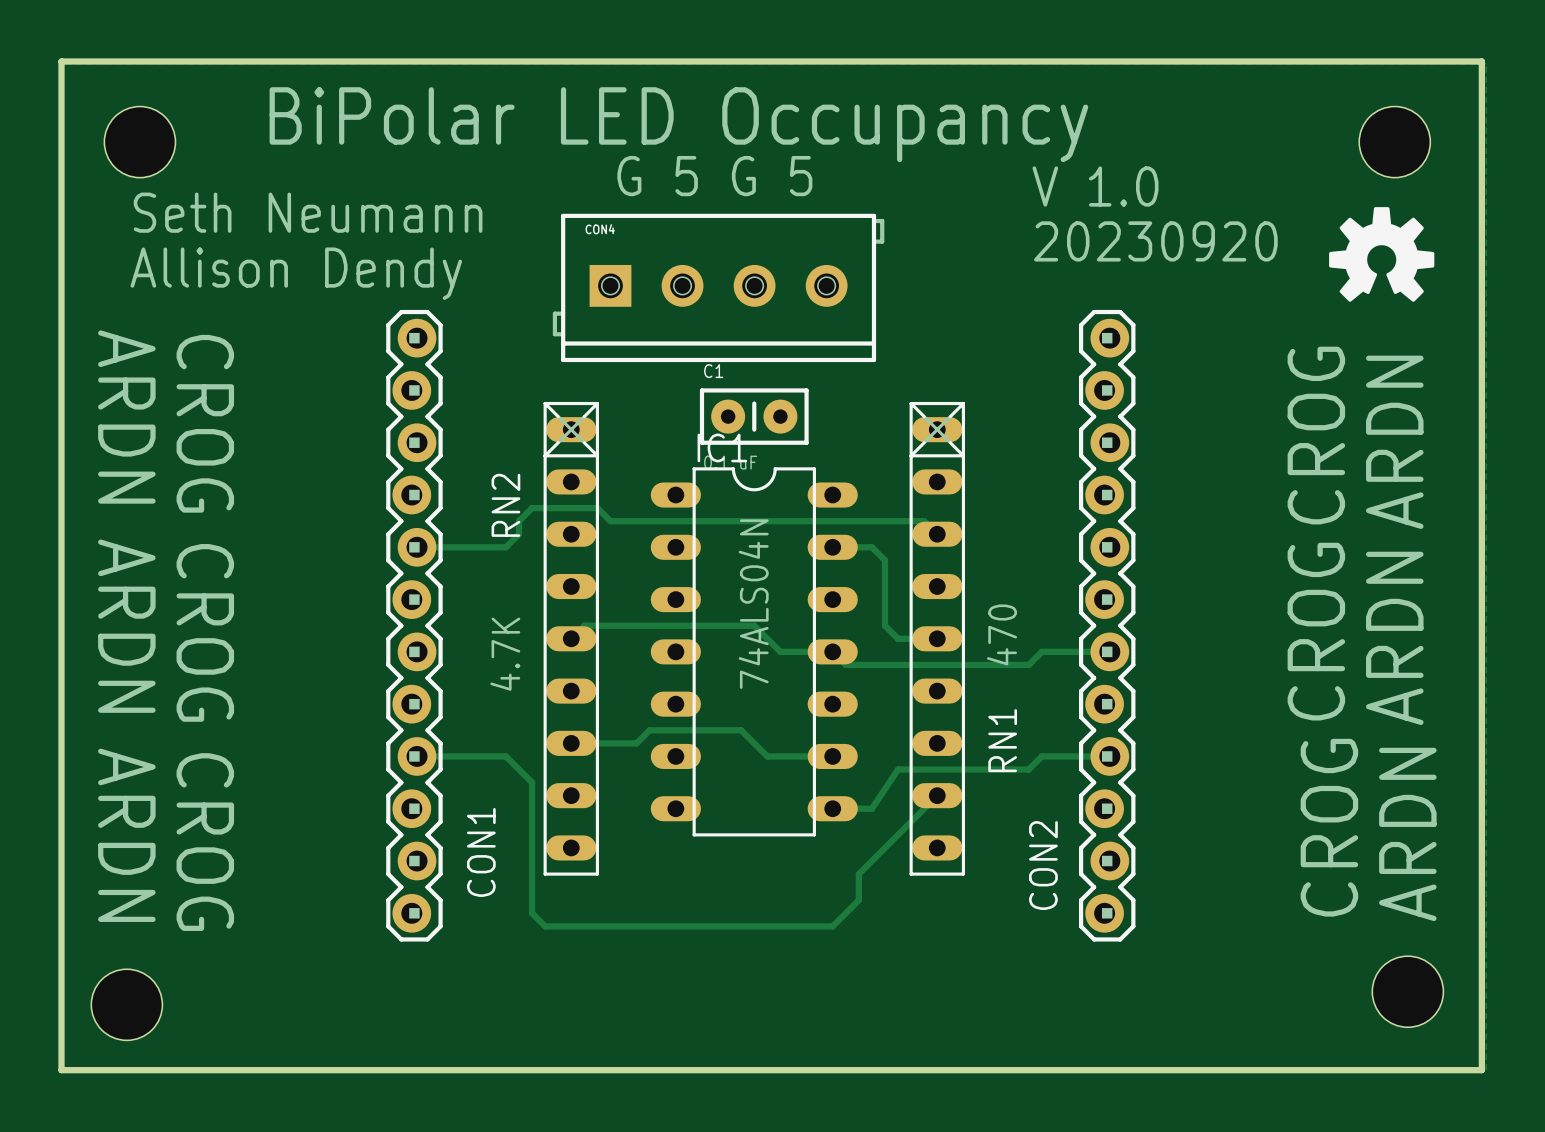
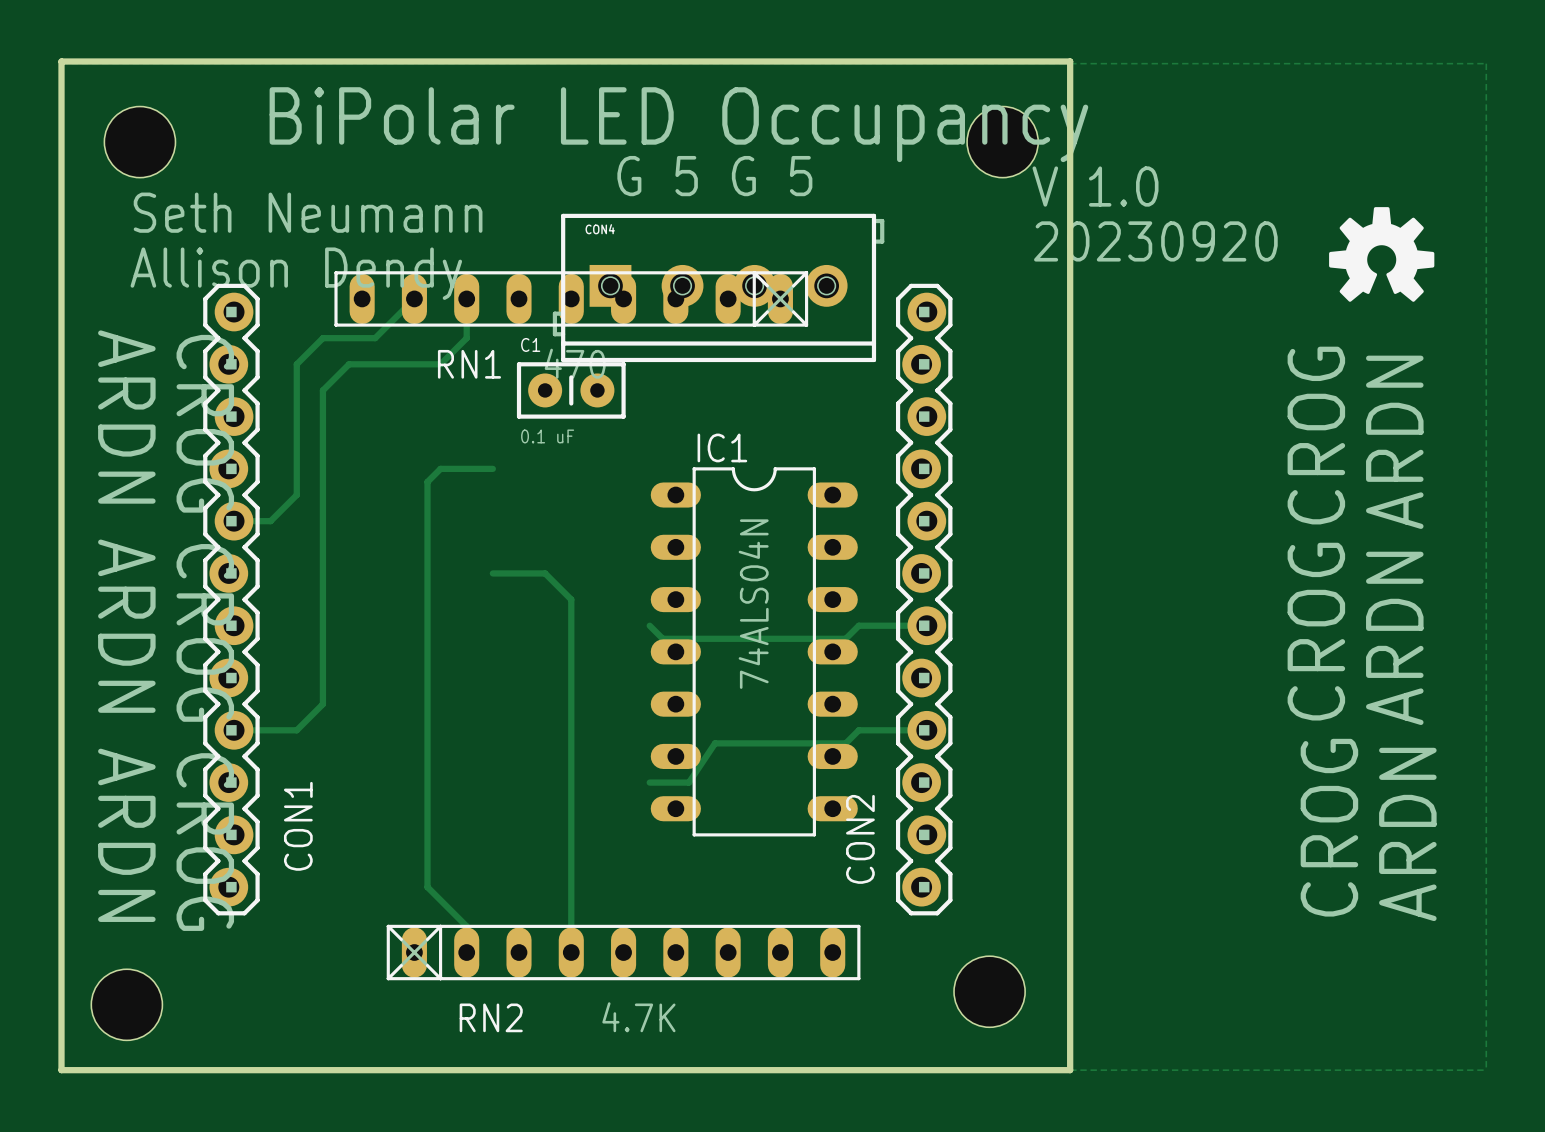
board edge: (1070, 61) (1481, 61) (1481, 1070) (1070, 1070) -> (1070, 61) (1070, 1070)
hole position: (1394, 142) -> (1002, 142)
track: none -> (414, 298) (375, 338) (322, 338) (296, 364) (296, 495) (270, 521) (234, 521)
track: none -> (466, 298) (466, 338) (440, 364) (349, 364) (322, 390) (322, 704) (296, 730) (234, 730)
C1 position: (754, 416) -> (571, 390)
track: none -> (492, 468) (440, 468) (427, 481) (427, 887) (466, 926) (466, 952)
track: (937, 534) (924, 521) (610, 521) (597, 508) (532, 508) (519, 521) (519, 534) (505, 547) (417, 547) -> none
track: (832, 547) (871, 547) (885, 560) (885, 625) (898, 638) (937, 638) -> none
track: none -> (492, 573) (545, 573) (571, 599) (571, 952)
CON1 position: (414, 625) -> (231, 599)
track: none -> (649, 625) (662, 638) (845, 638) (858, 625) (926, 625)
CON2 position: (1107, 625) -> (924, 599)
track: (571, 638) (584, 625) (754, 625) (780, 651) (832, 651) (845, 664) (1028, 664) (1041, 651) (1109, 651) -> none
RN2 rotation: 0° (571, 638) -> 90° counterclockwise (623, 952)
RN2 position: (571, 638) -> (623, 952)
RN1 rotation: 0° (937, 638) -> 90° clockwise (571, 298)
RN1 position: (937, 638) -> (571, 298)
track: (571, 743) (636, 743) (649, 730) (741, 730) (767, 756) (832, 756) -> none
track: (417, 756) (505, 756) (532, 782) (532, 913) (545, 926) (832, 926) (858, 900) (858, 874) (937, 795) -> none
track: (1109, 756) (1041, 756) (1028, 769) (898, 769) (871, 808) (832, 808) -> (926, 730) (858, 730) (845, 743) (715, 743) (688, 782) (649, 782)
hole position: (1407, 991) -> (989, 991)

